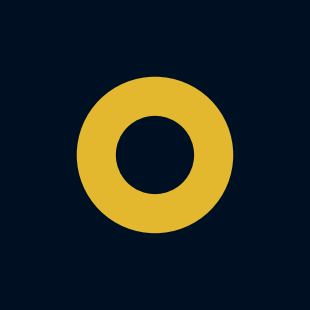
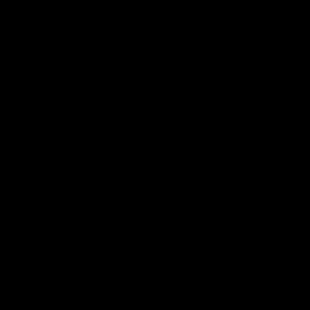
part: (154, 154) -> none

